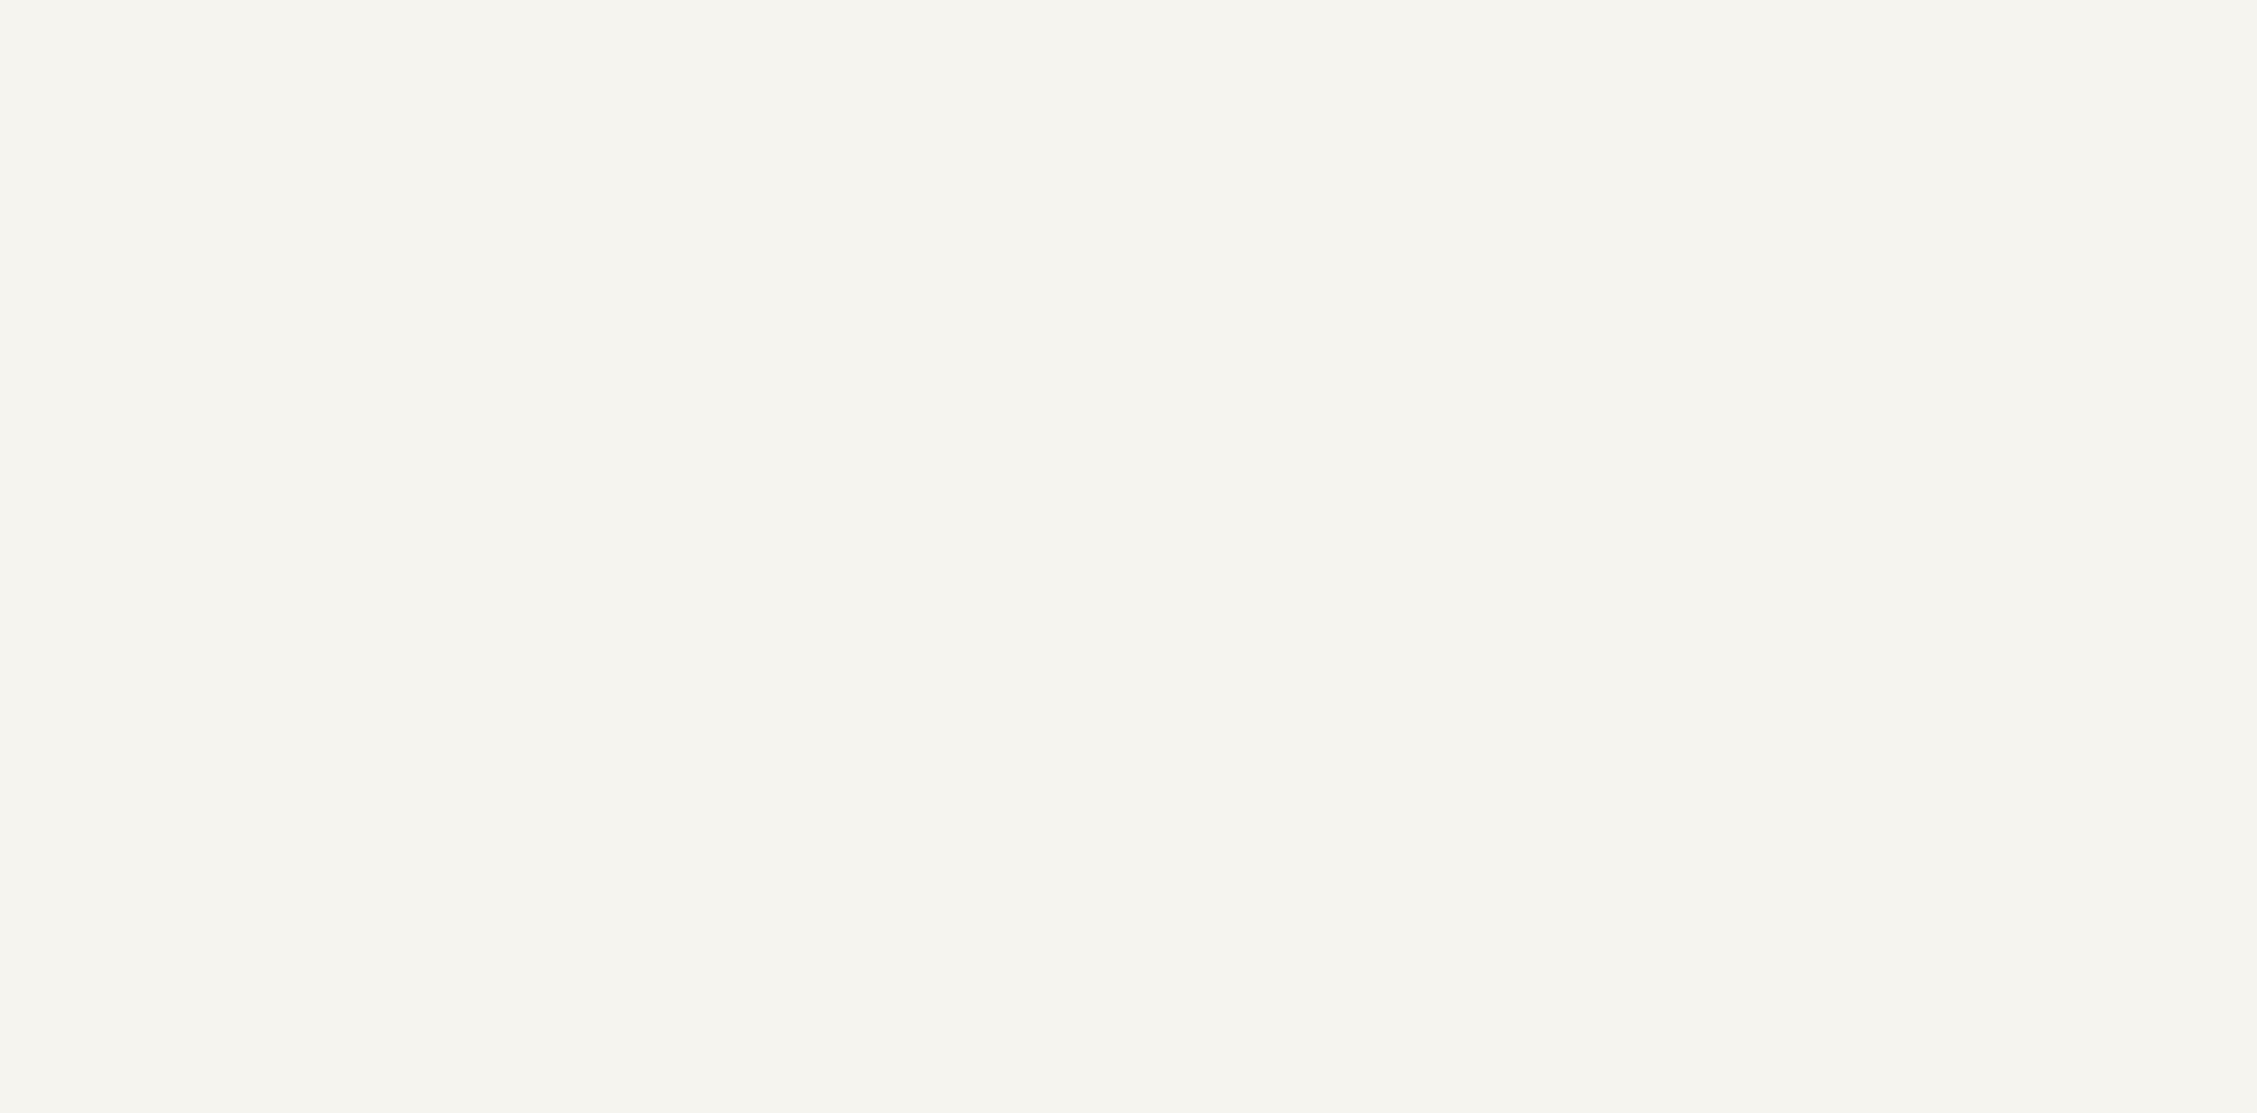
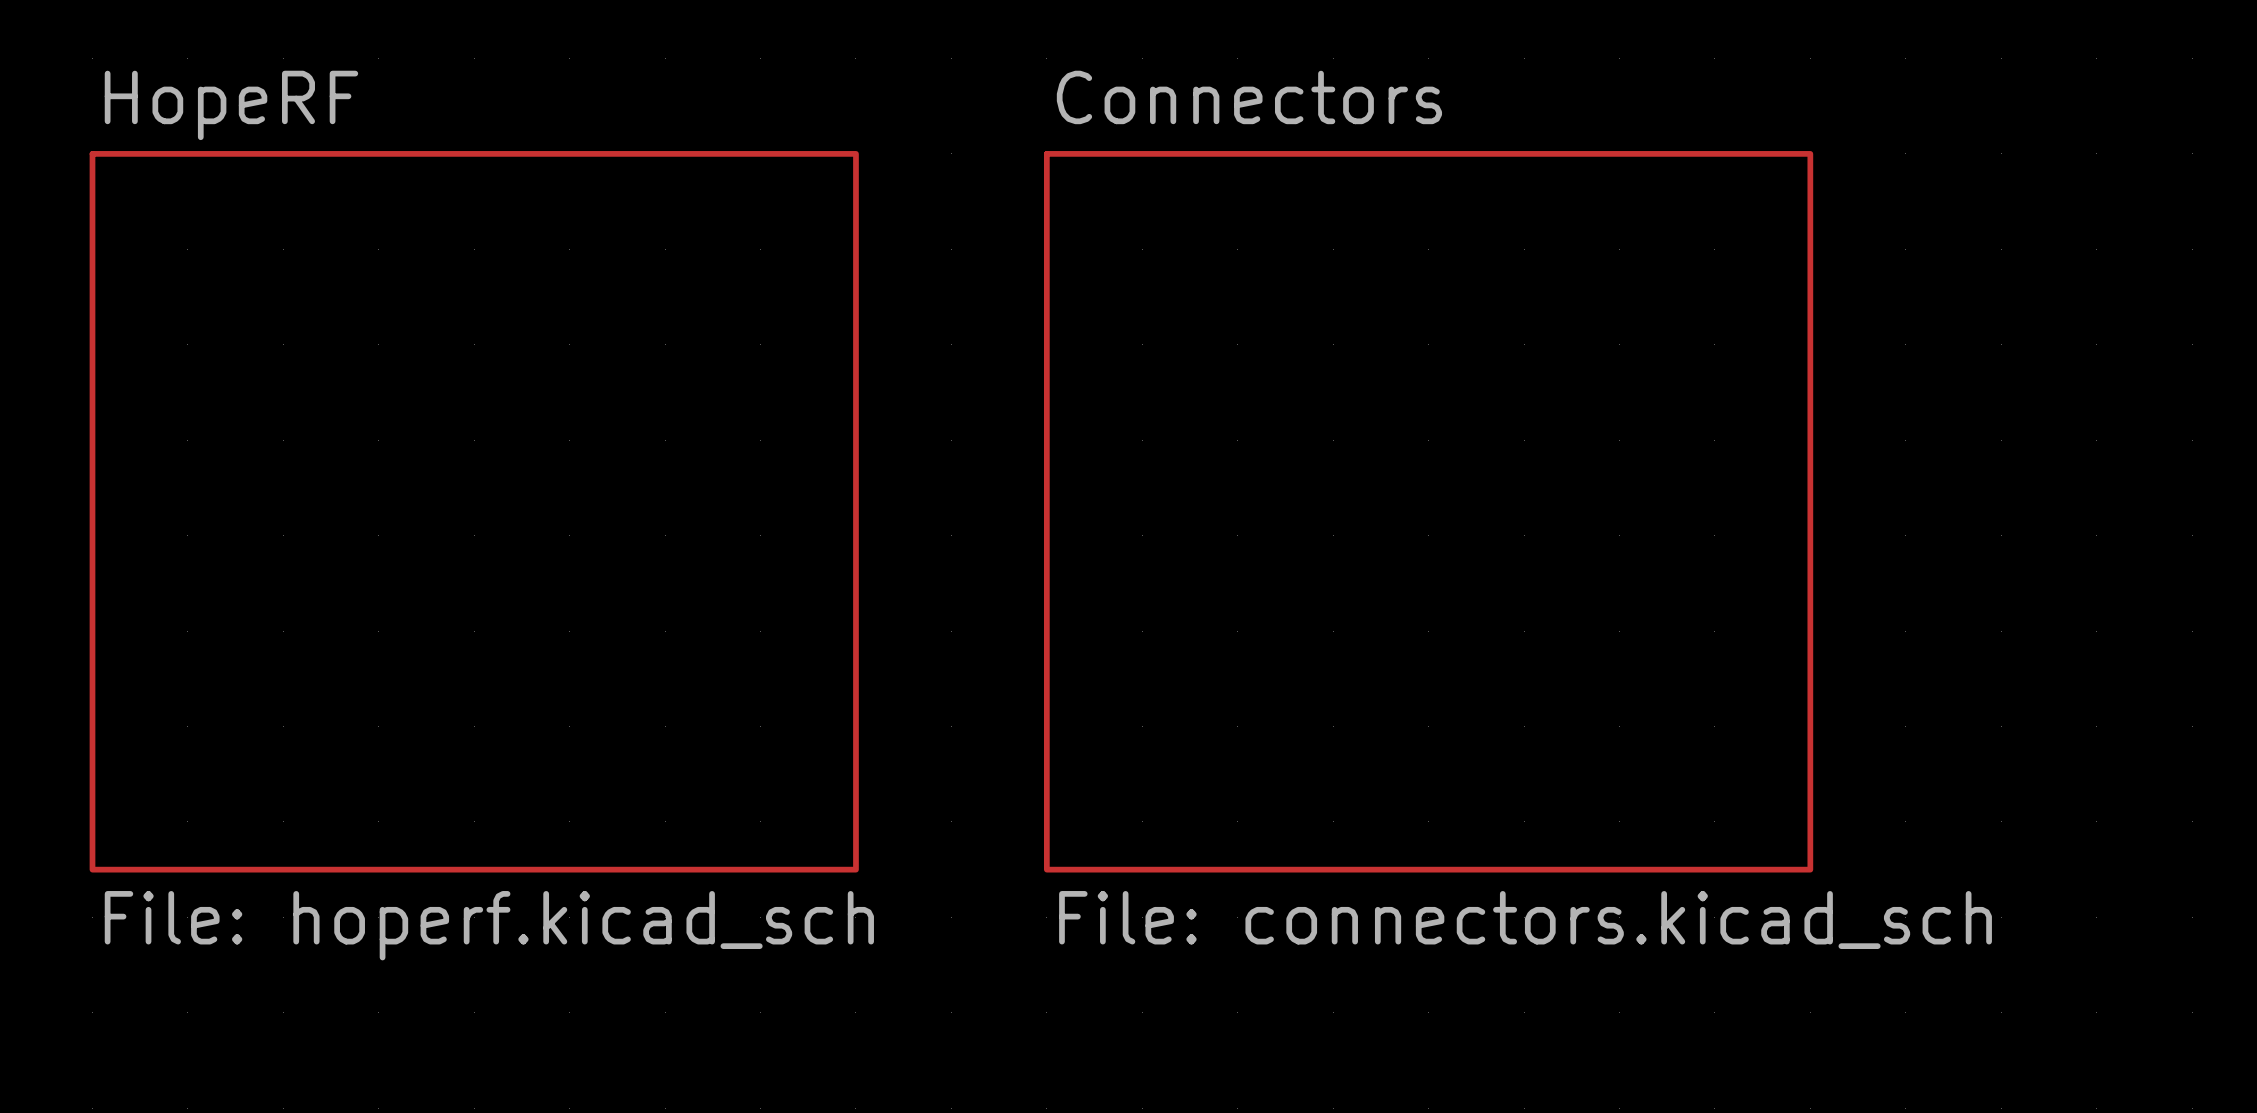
sheet HopeRF: none -> File: hoperf.kicad_sch (474, 511)
sheet Connectors: none -> File: connectors.kicad_sch (1428, 511)

